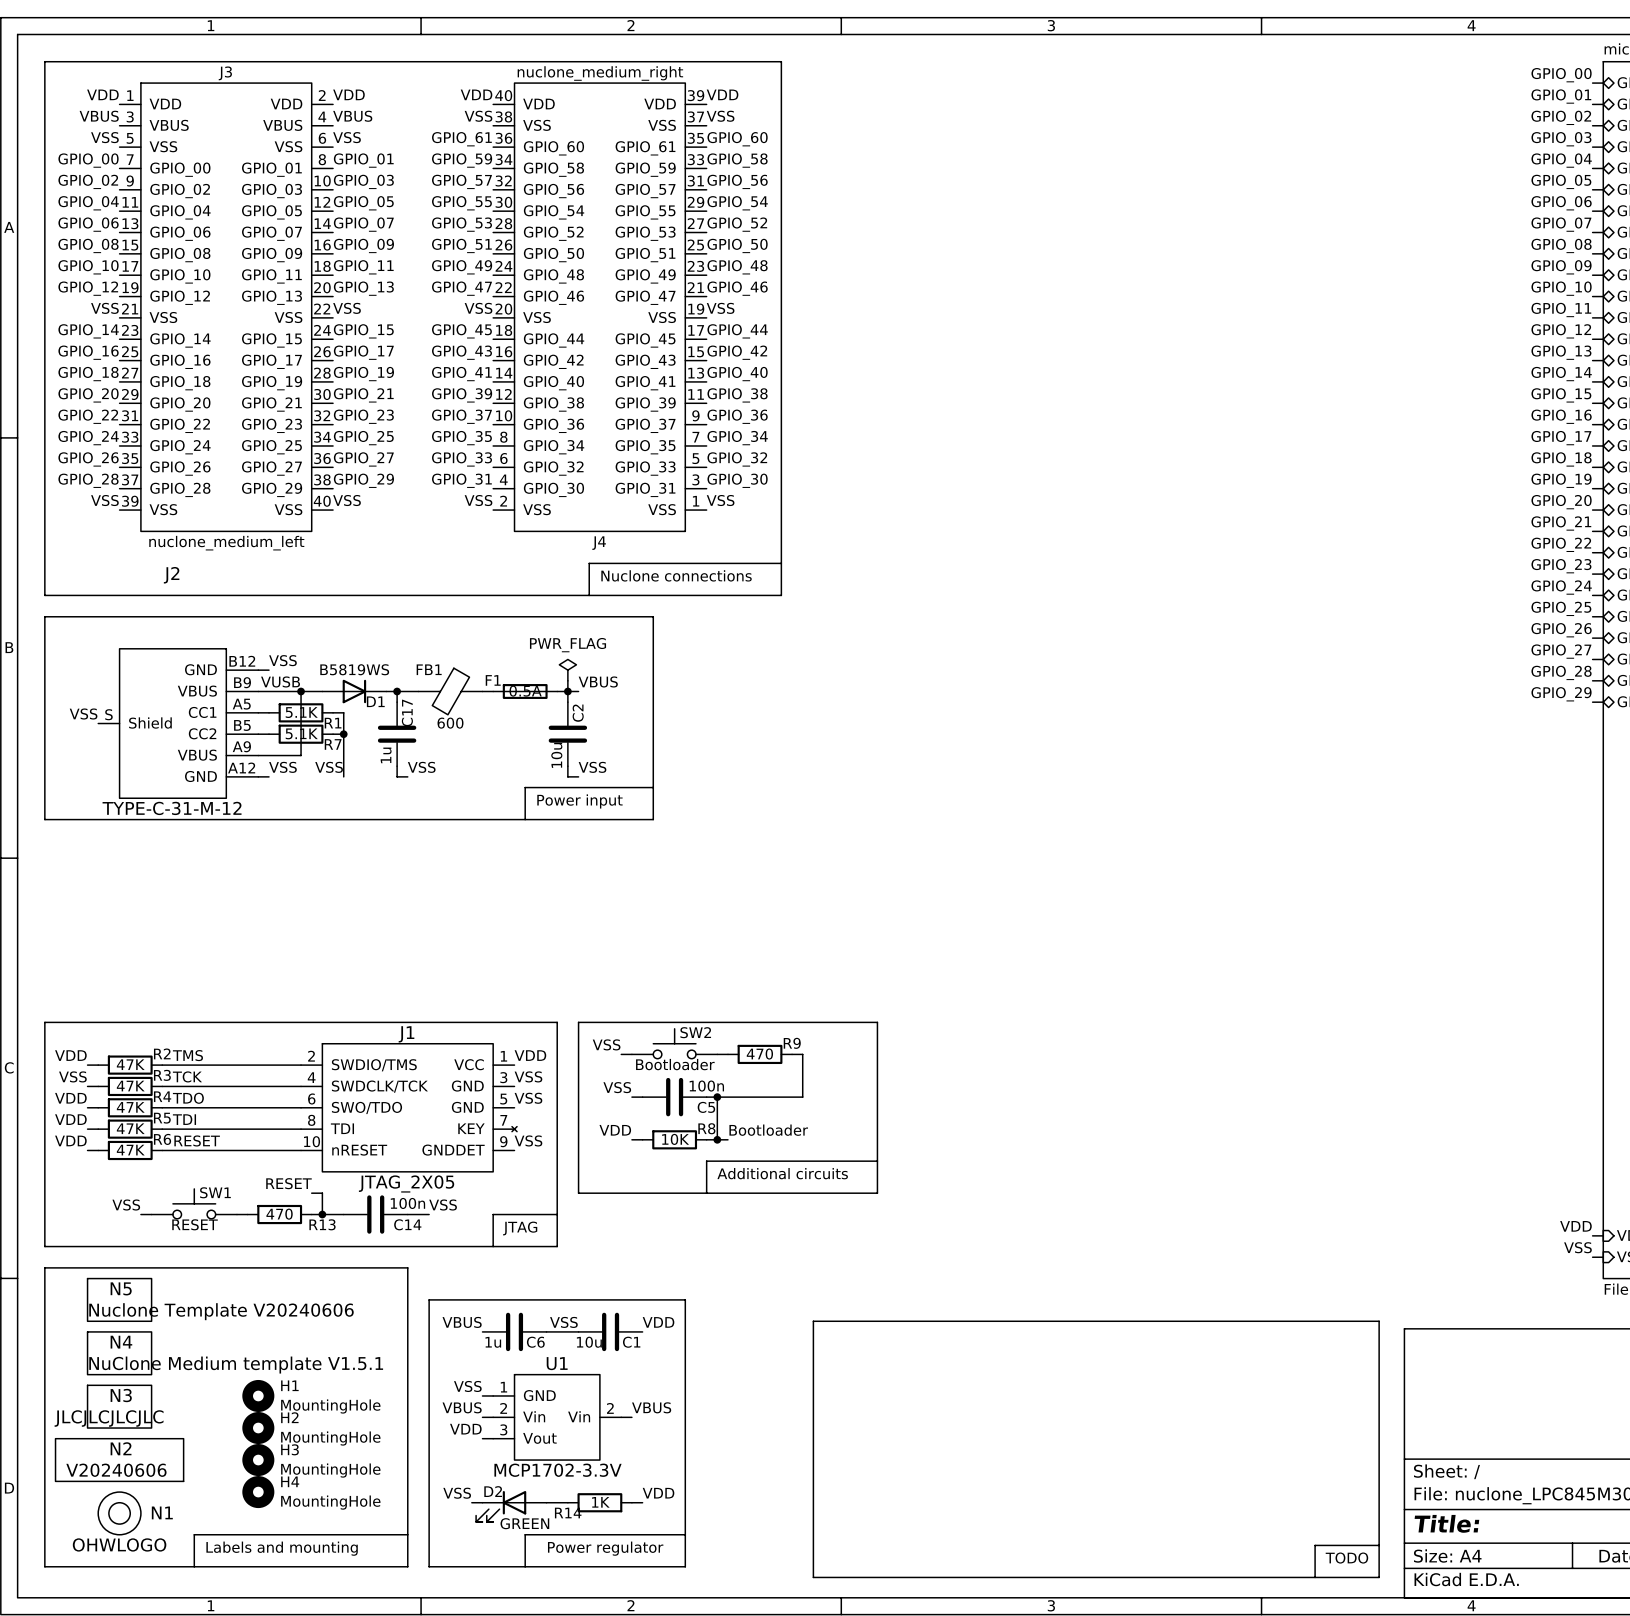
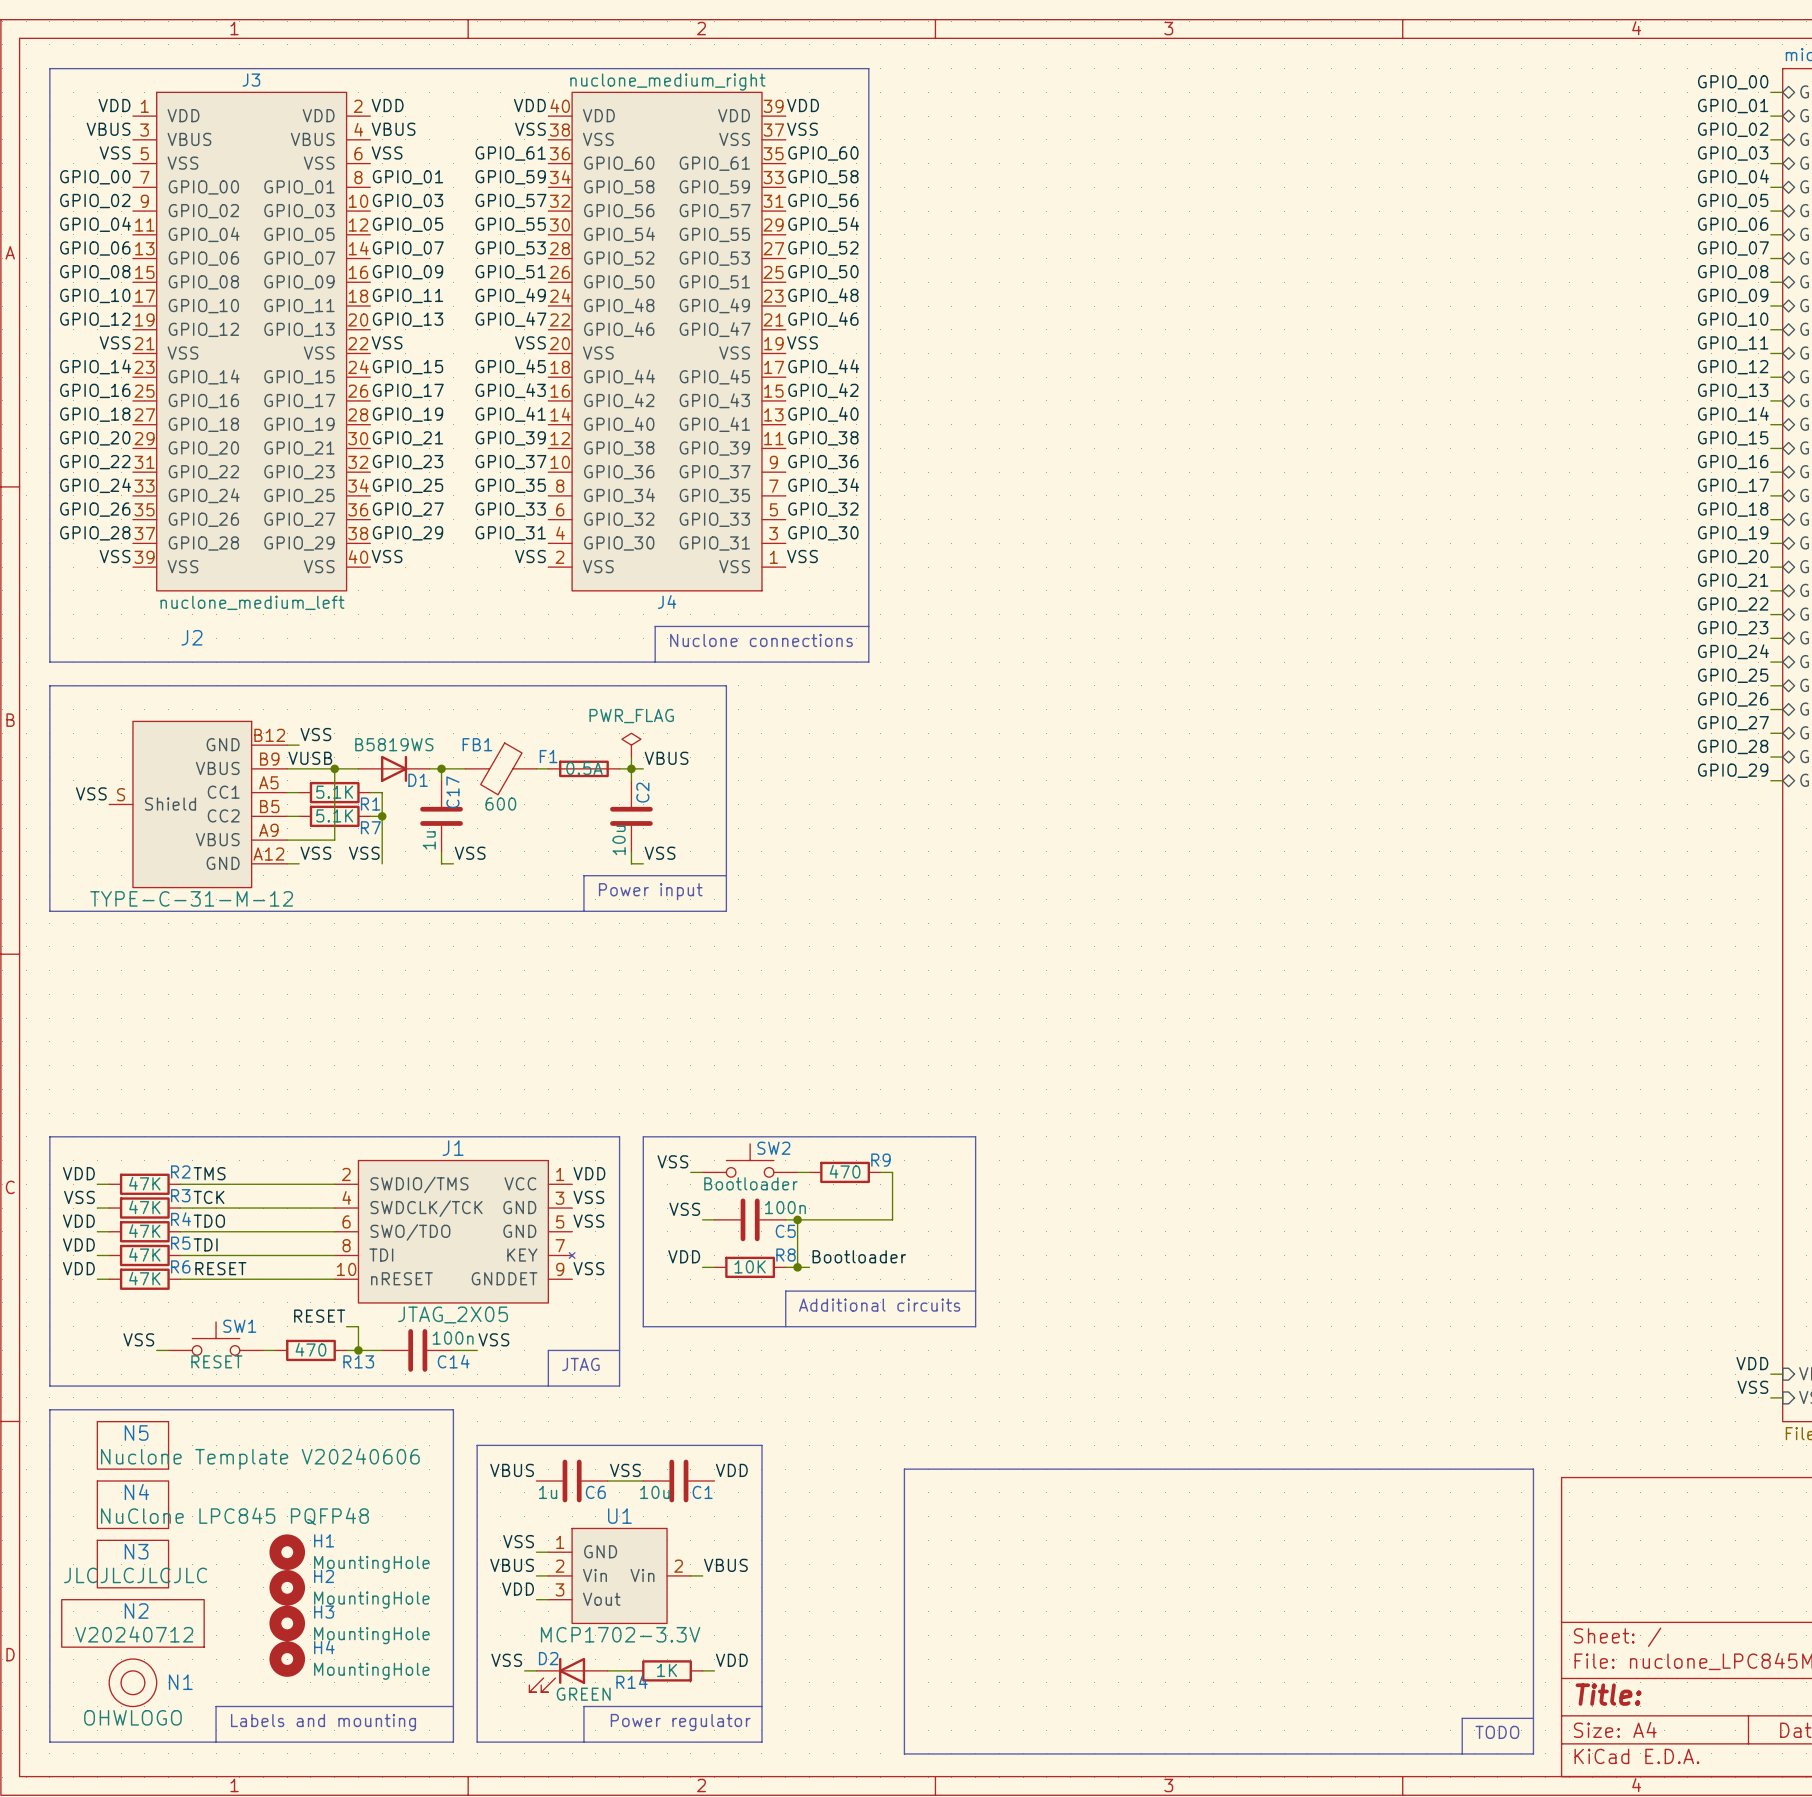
N4 value: NuClone Medium template V1.5.1 (236, 1365) -> NuClone LPC845 PQFP48 (234, 1516)
N2 value: V20240606 (116, 1470) -> V20240712 (134, 1634)

